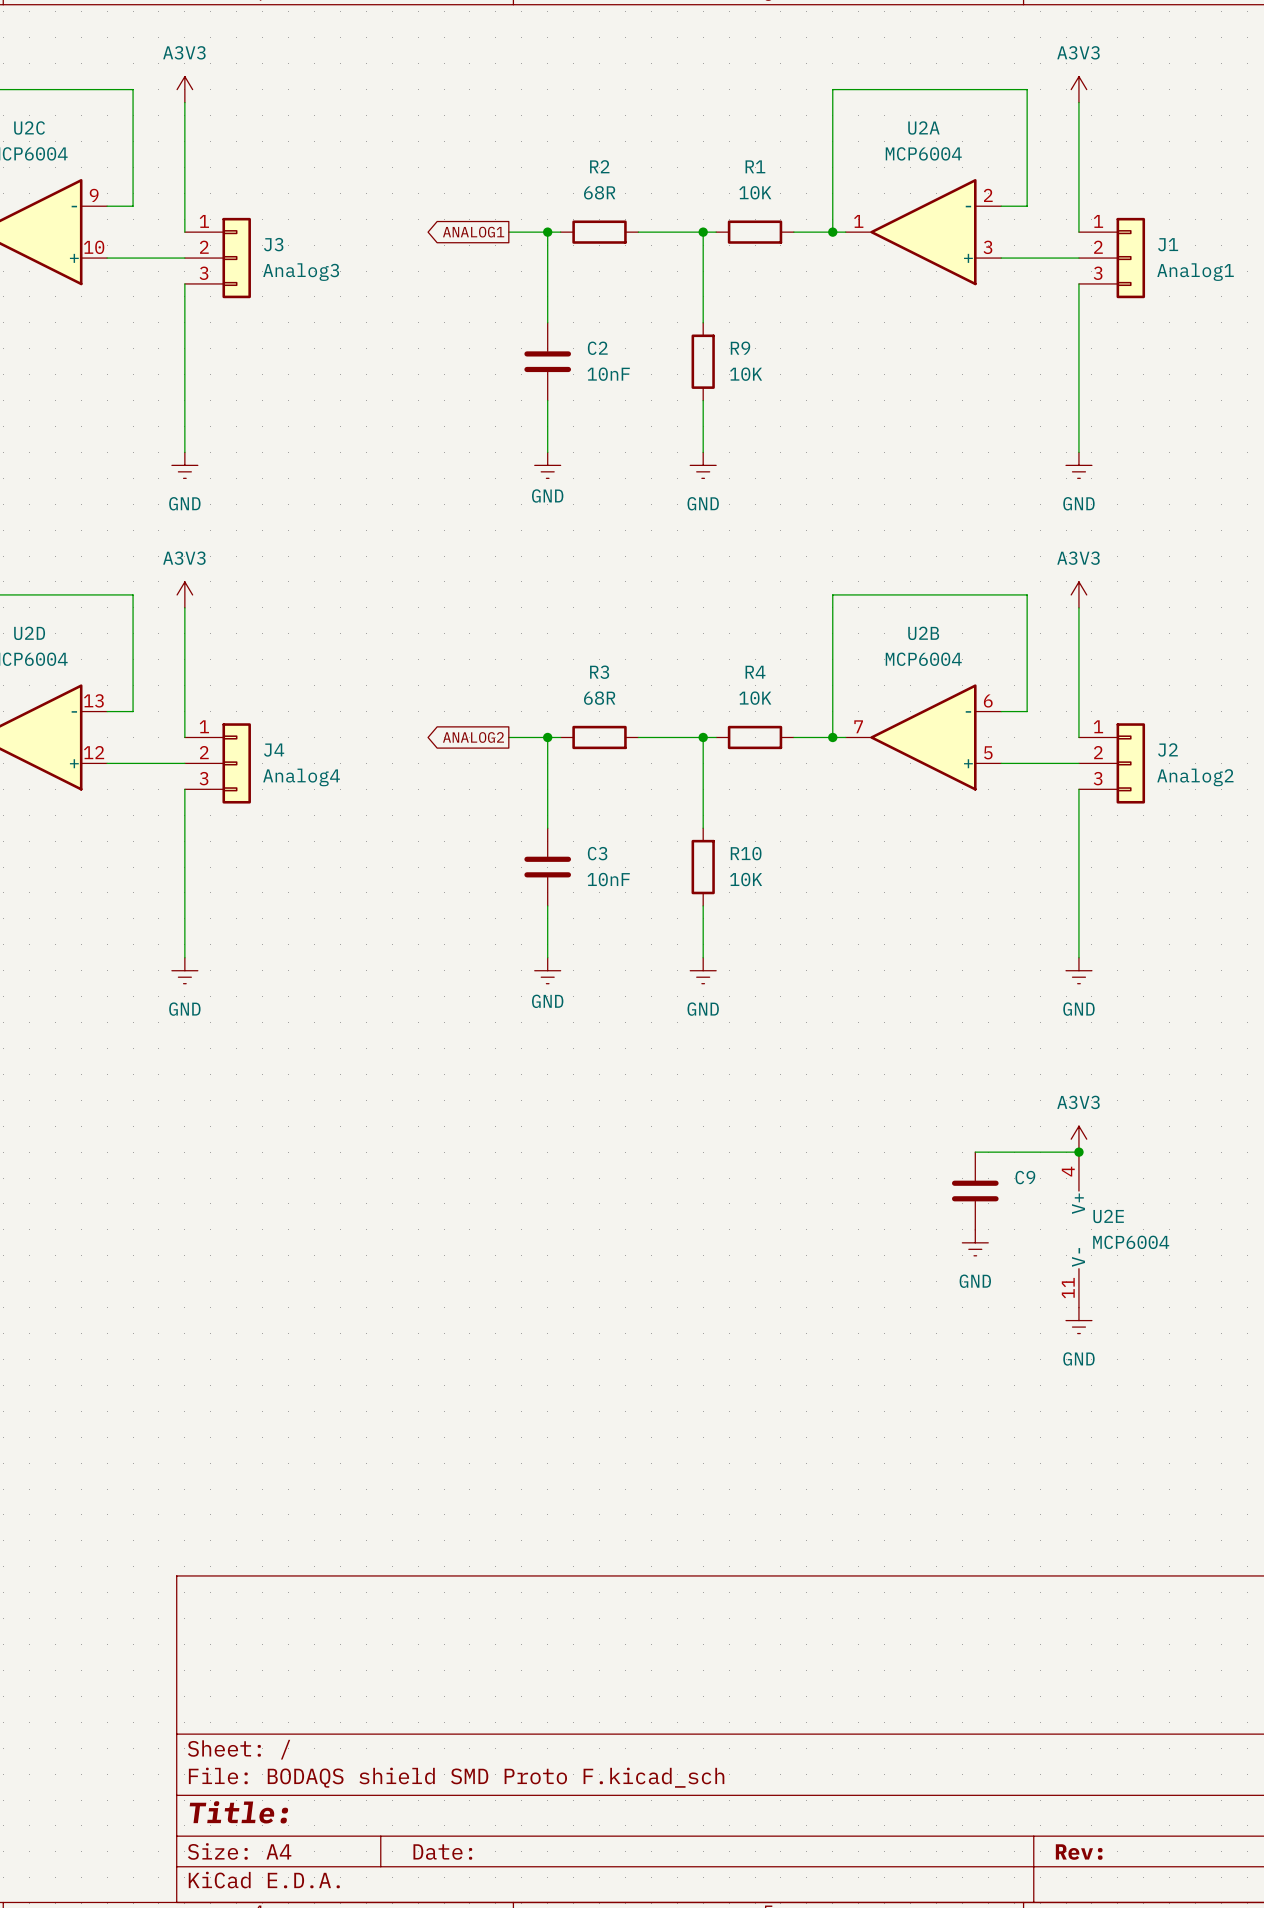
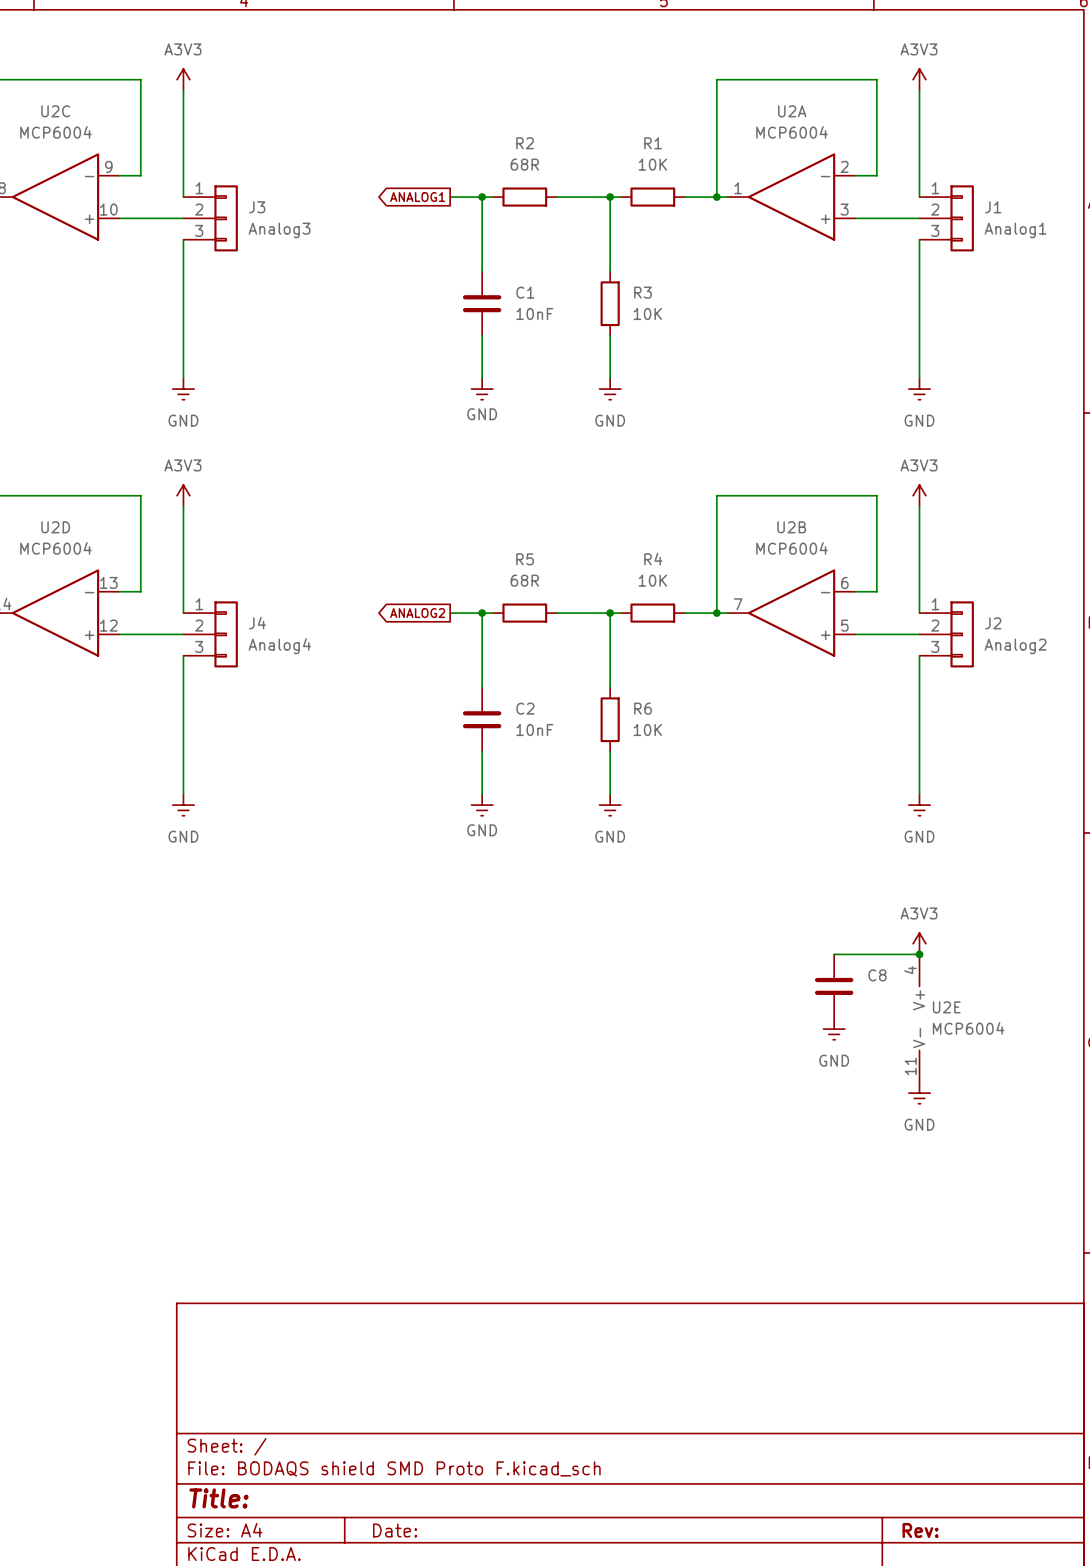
C2 name: C2 (597, 348) -> C1 (525, 292)
R9 name: R9 (740, 348) -> R3 (643, 292)
R3 name: R3 (599, 672) -> R5 (525, 559)
C3 name: C3 (597, 853) -> C2 (525, 708)
R10 name: R10 (746, 853) -> R6 (643, 708)
C9 name: C9 (1025, 1177) -> C8 (877, 975)

